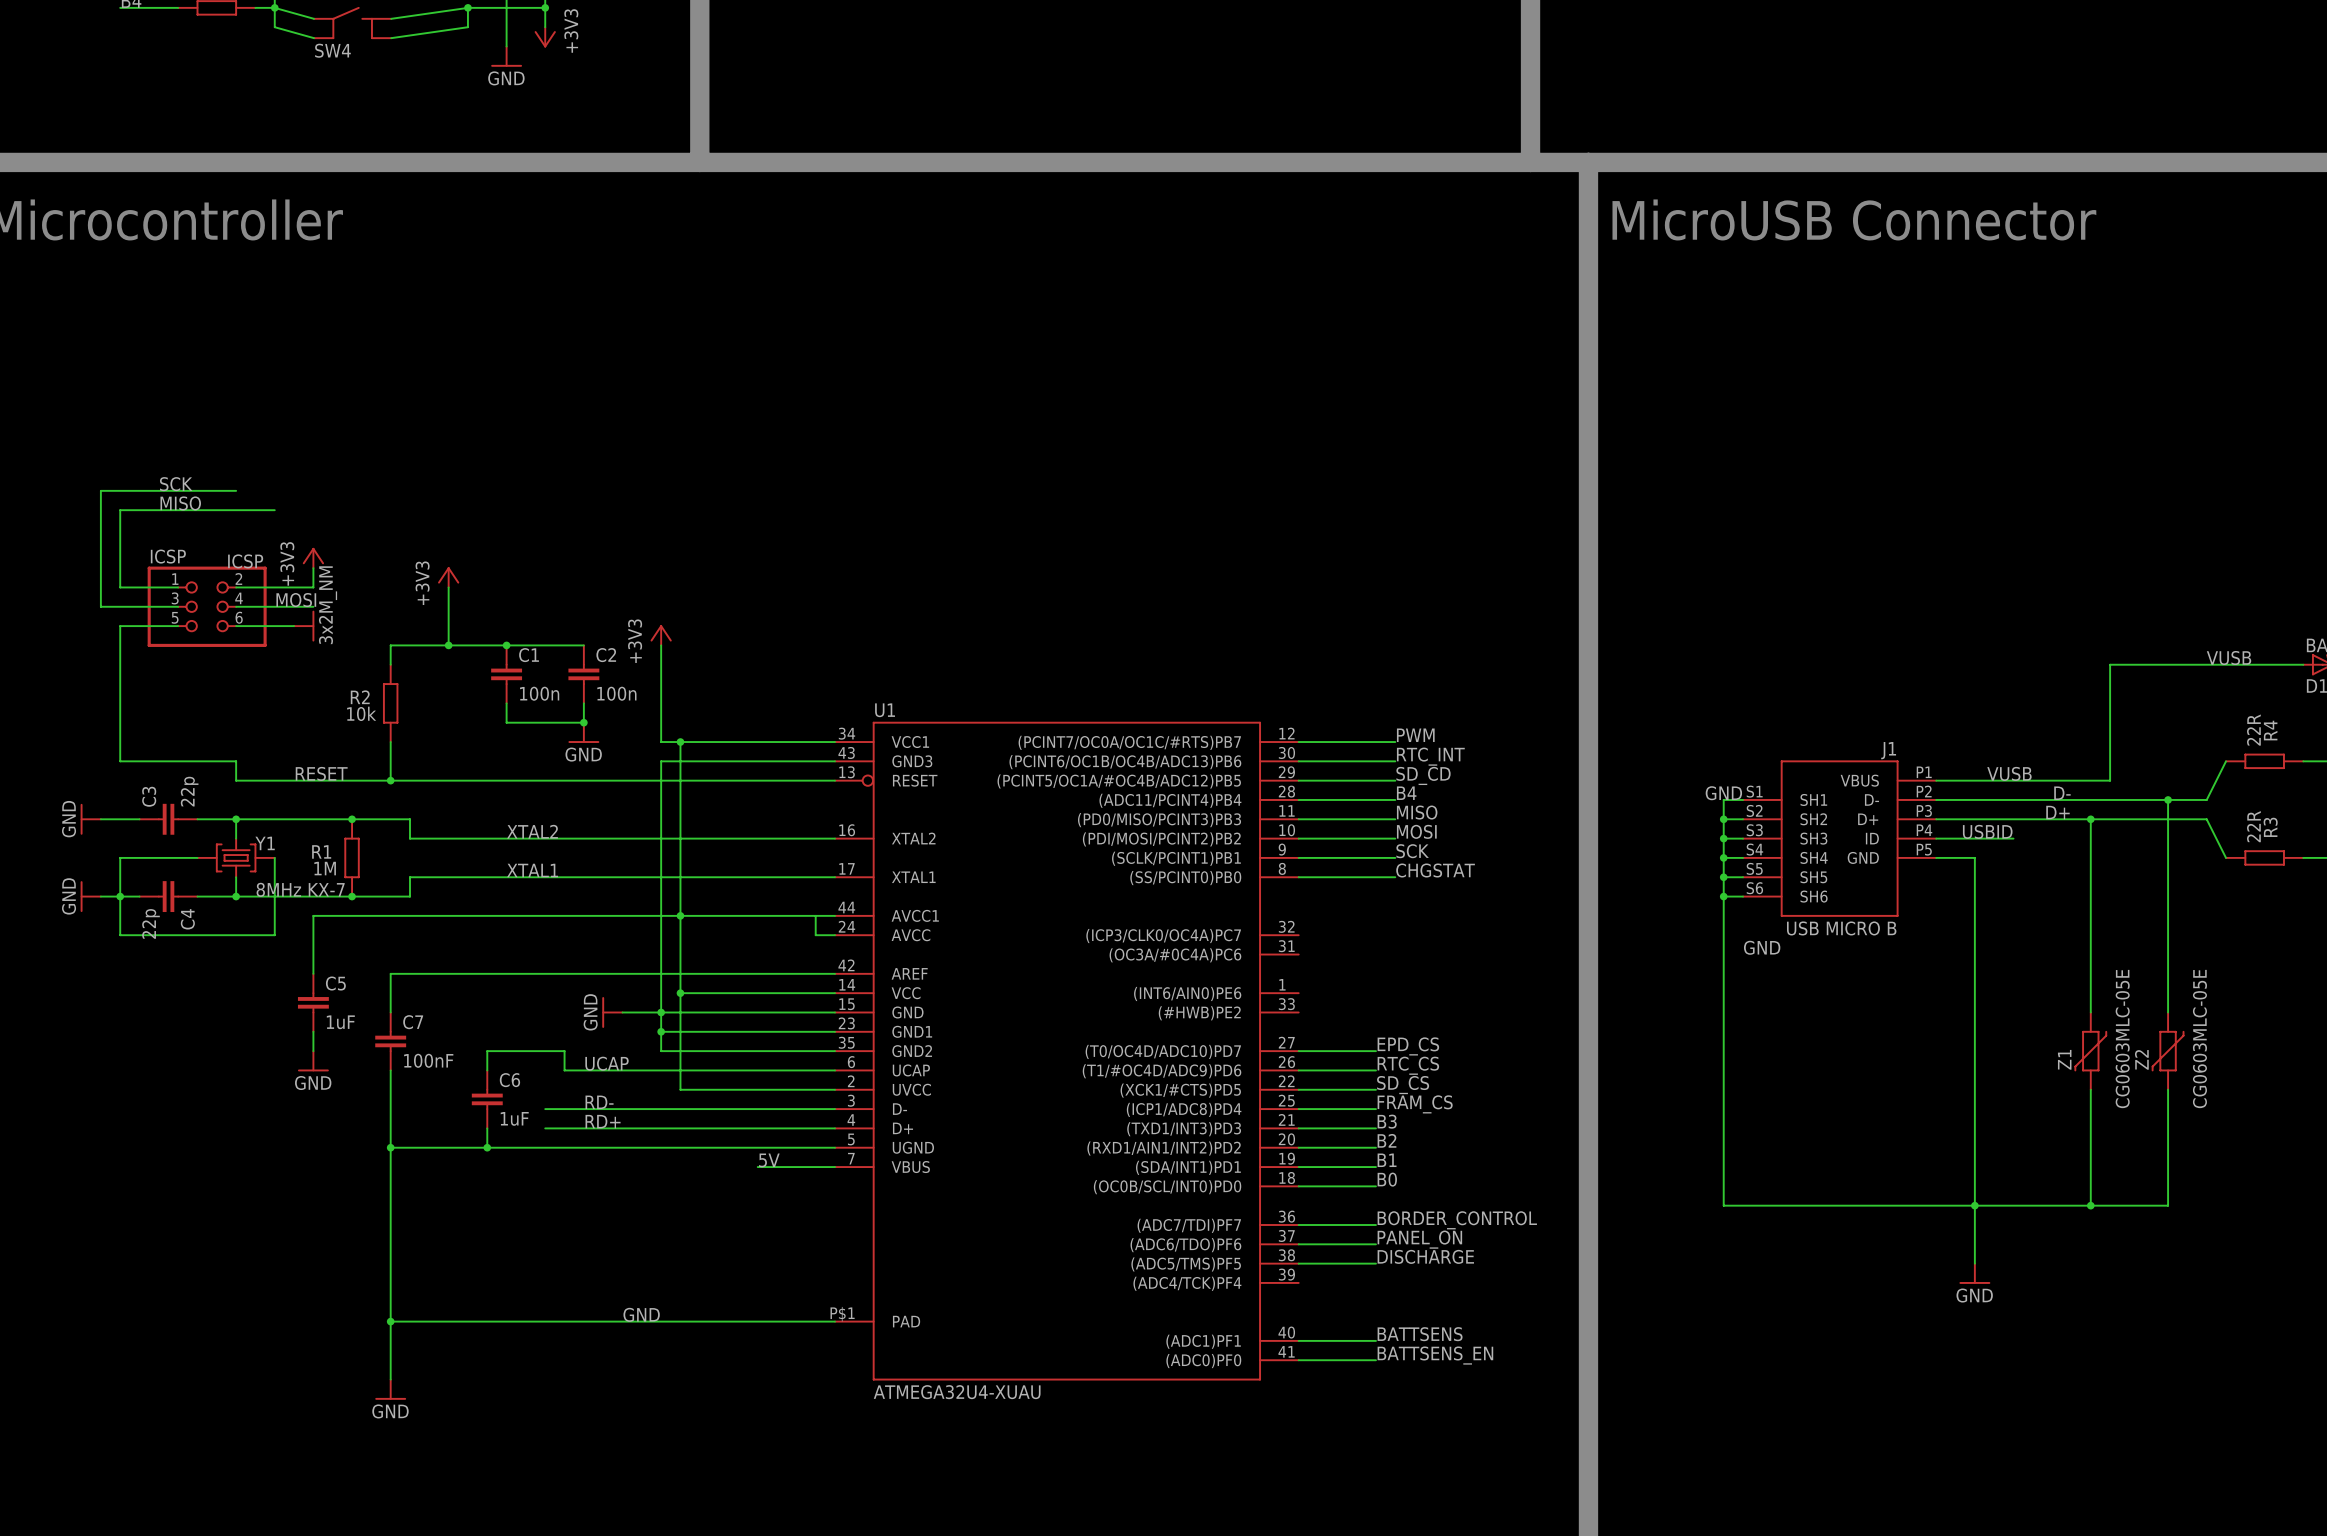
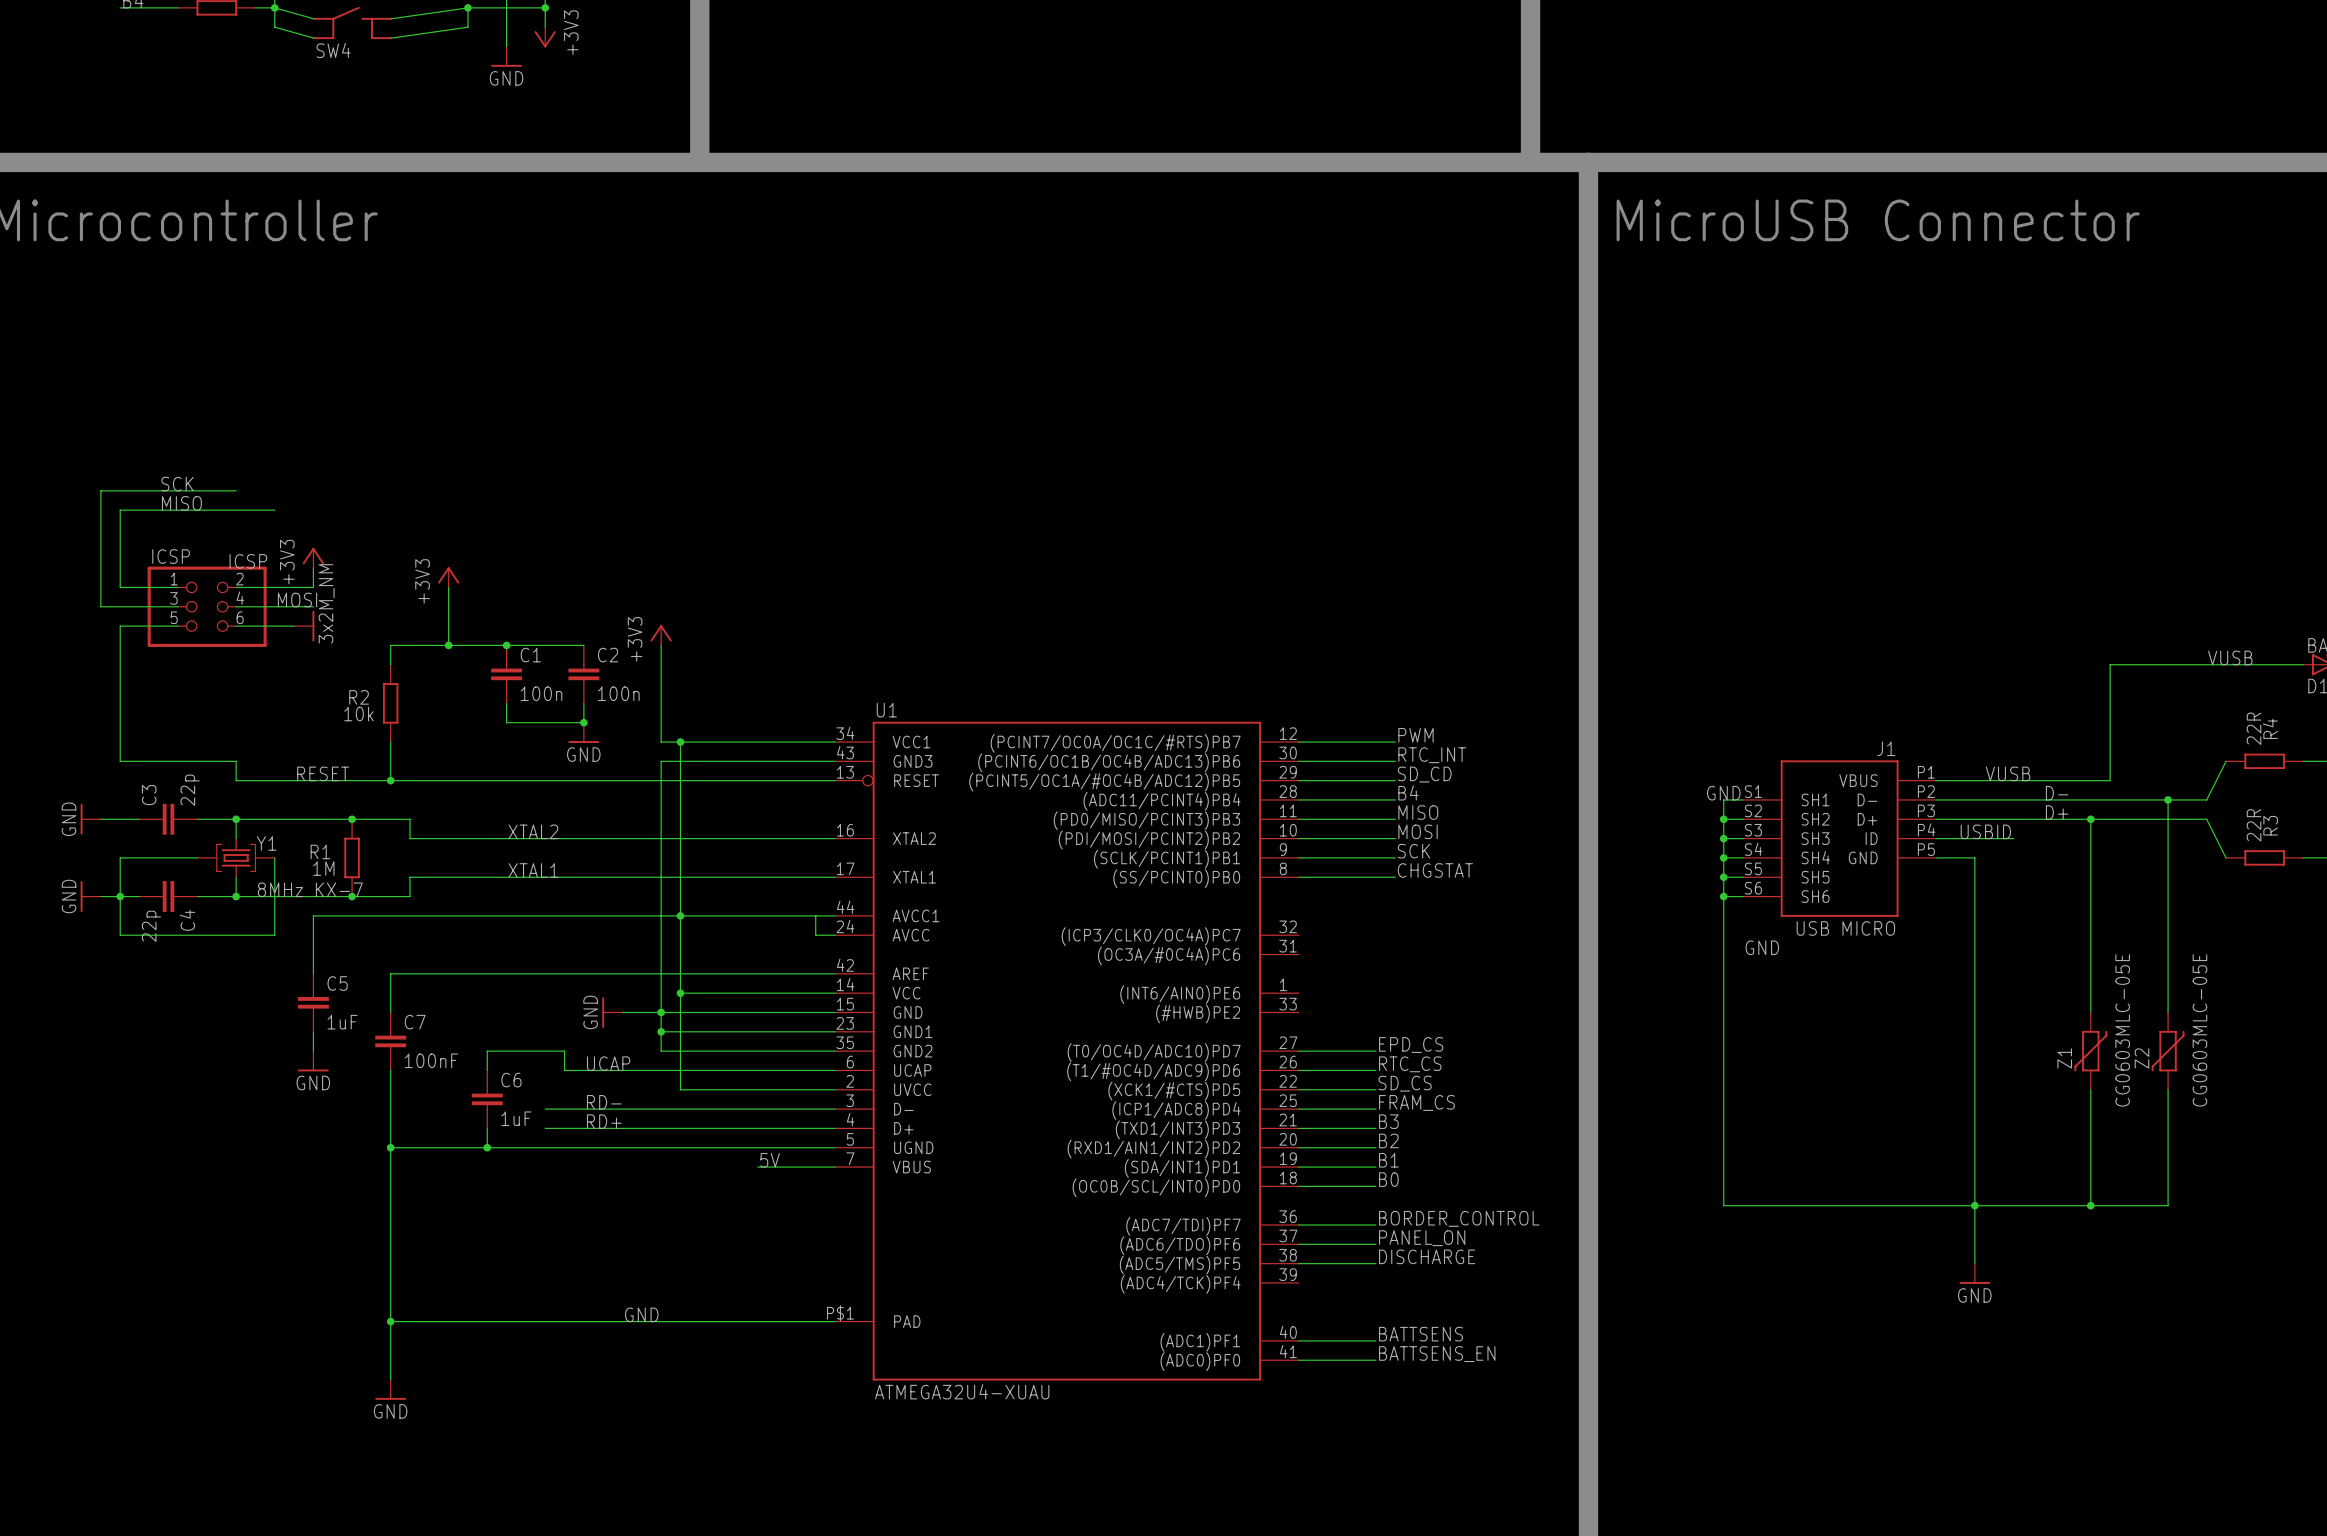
J1 value: USB MICRO B (1841, 928) -> USB MICRO (1845, 928)

